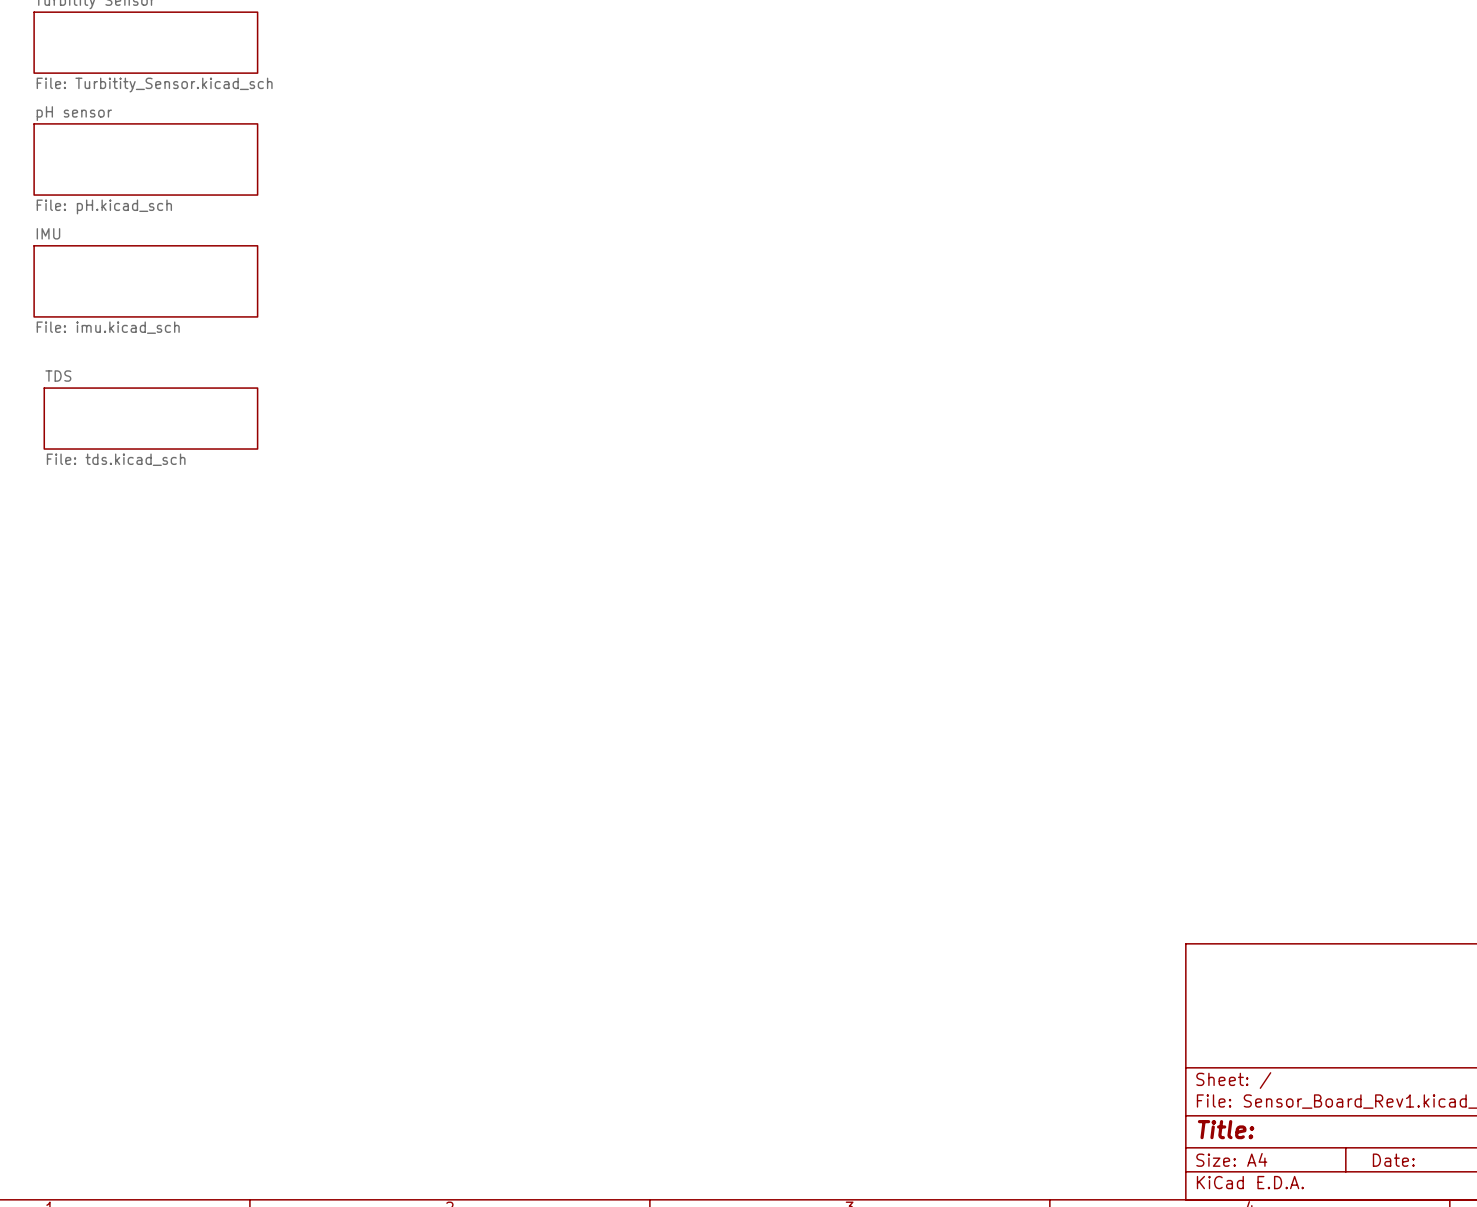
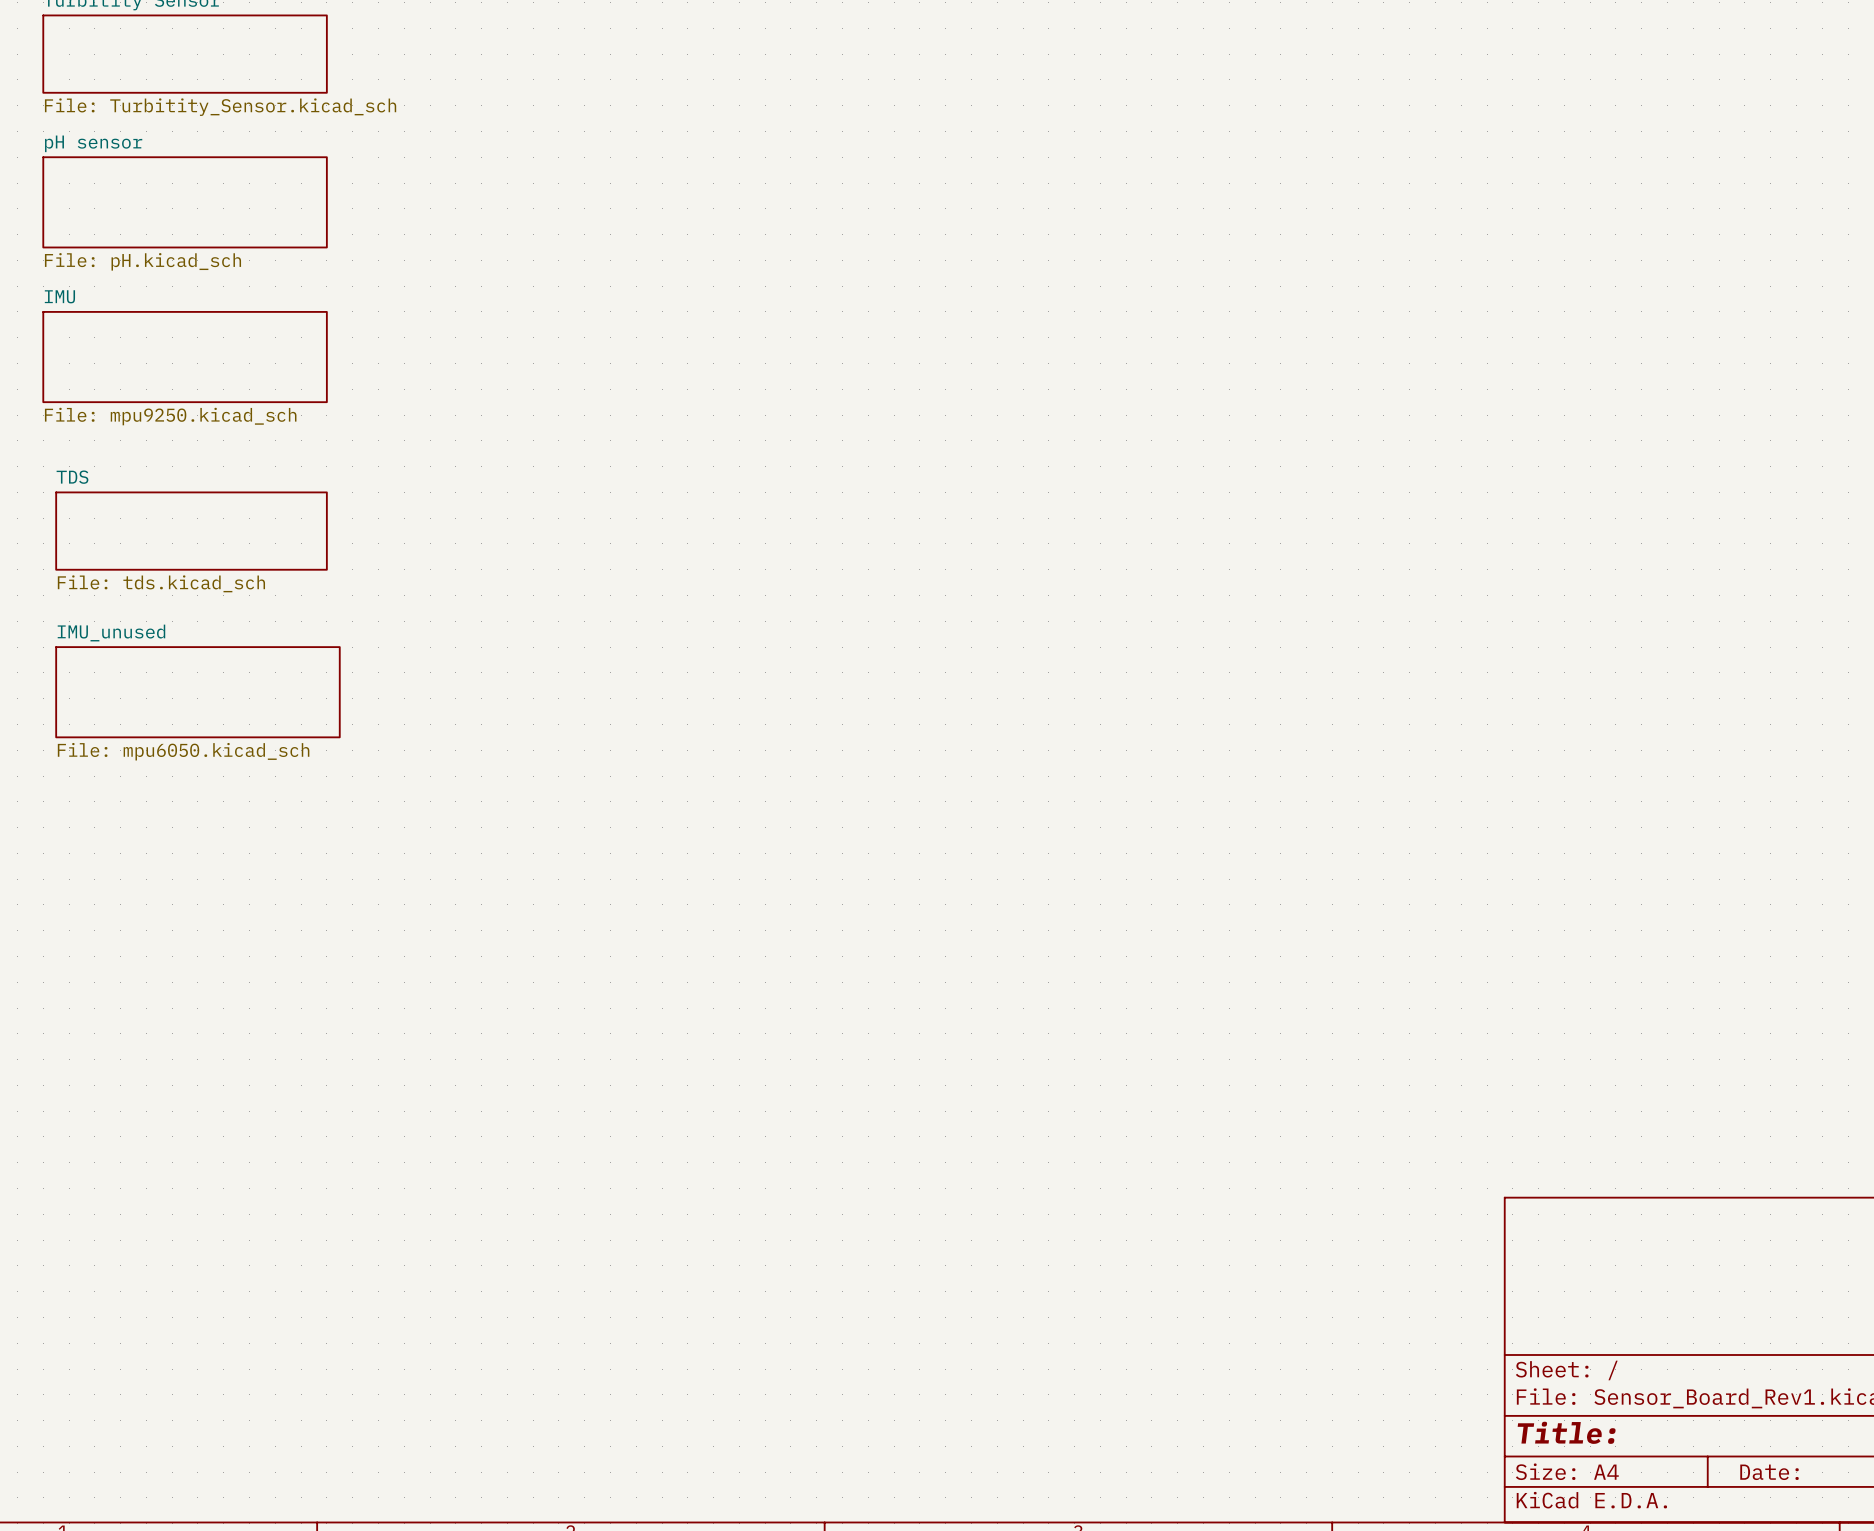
sheet IMU value: File: imu.kicad_sch (108, 327) -> File: mpu9250.kicad_sch (170, 416)
sheet IMU_unused: none -> File: mpu6050.kicad_sch (197, 692)

